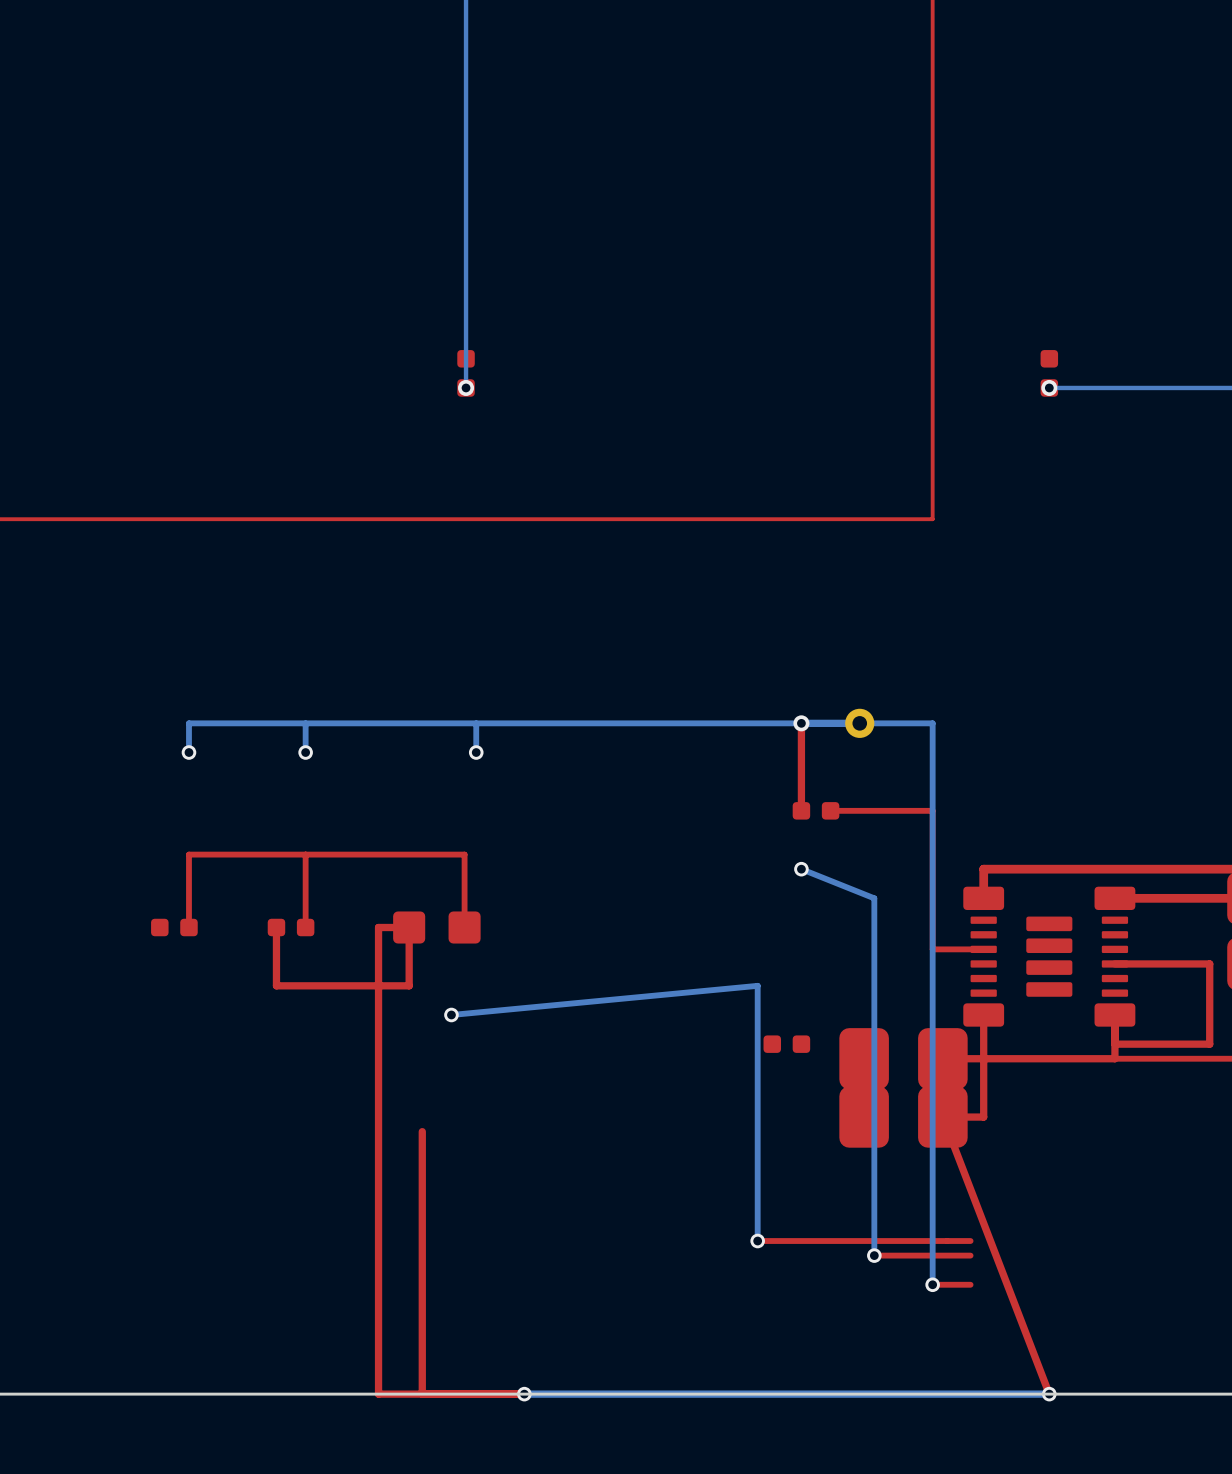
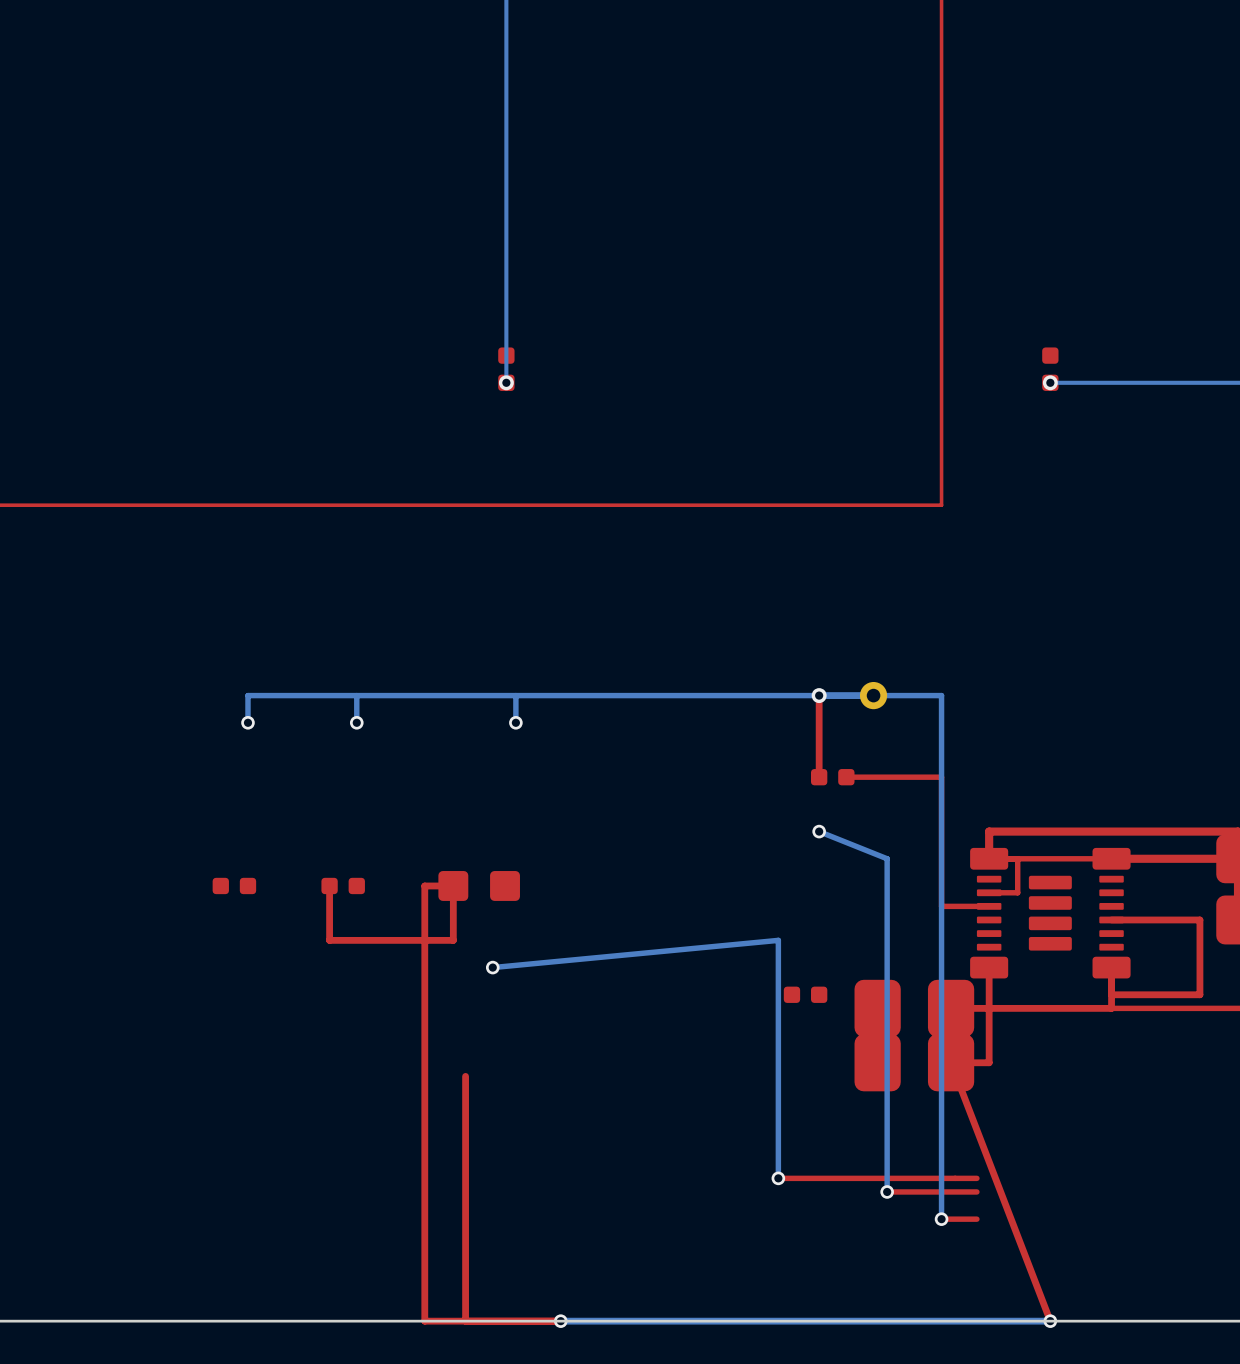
top track: (305, 854) (305, 927) -> none
top track: none -> (1017, 858) (1017, 892) (989, 892)
top track: none -> (1111, 858) (989, 858)
top track: (464, 927) (464, 854) (188, 854) (188, 927) -> none

